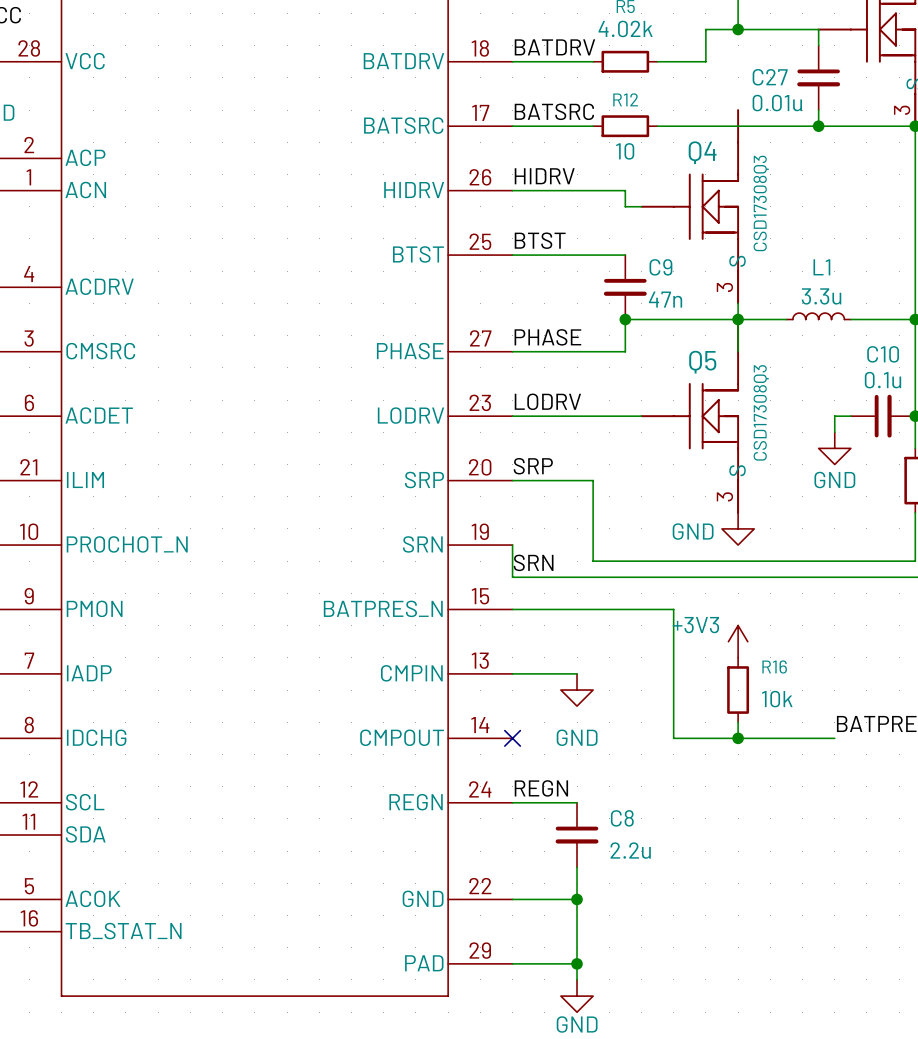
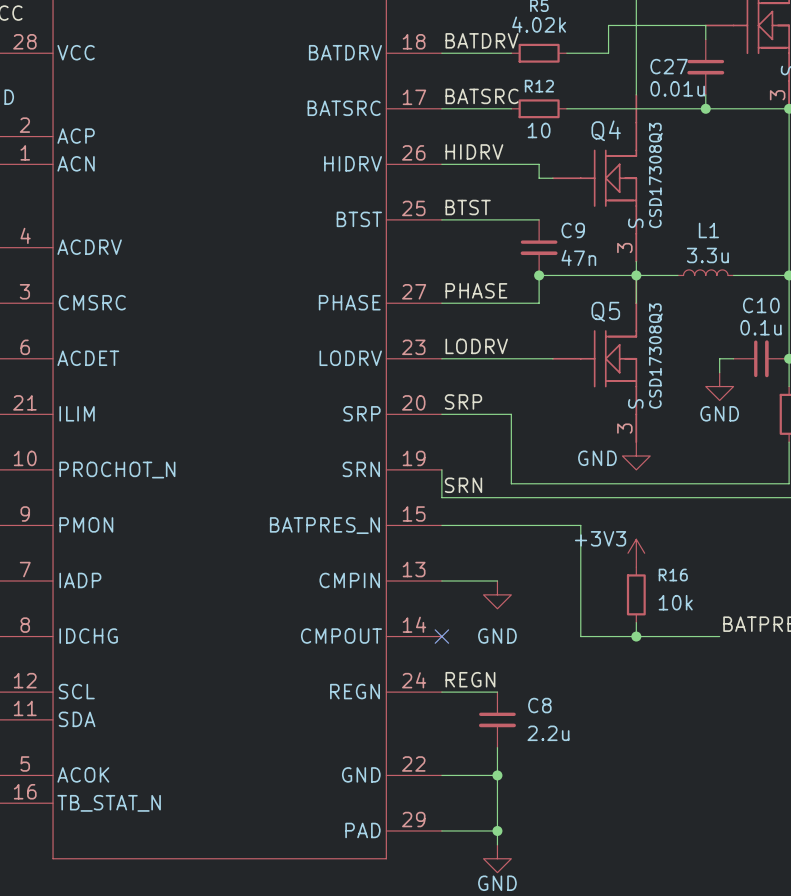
wire: none -> (636, 25) (636, 94)
junction: (738, 29) -> none

